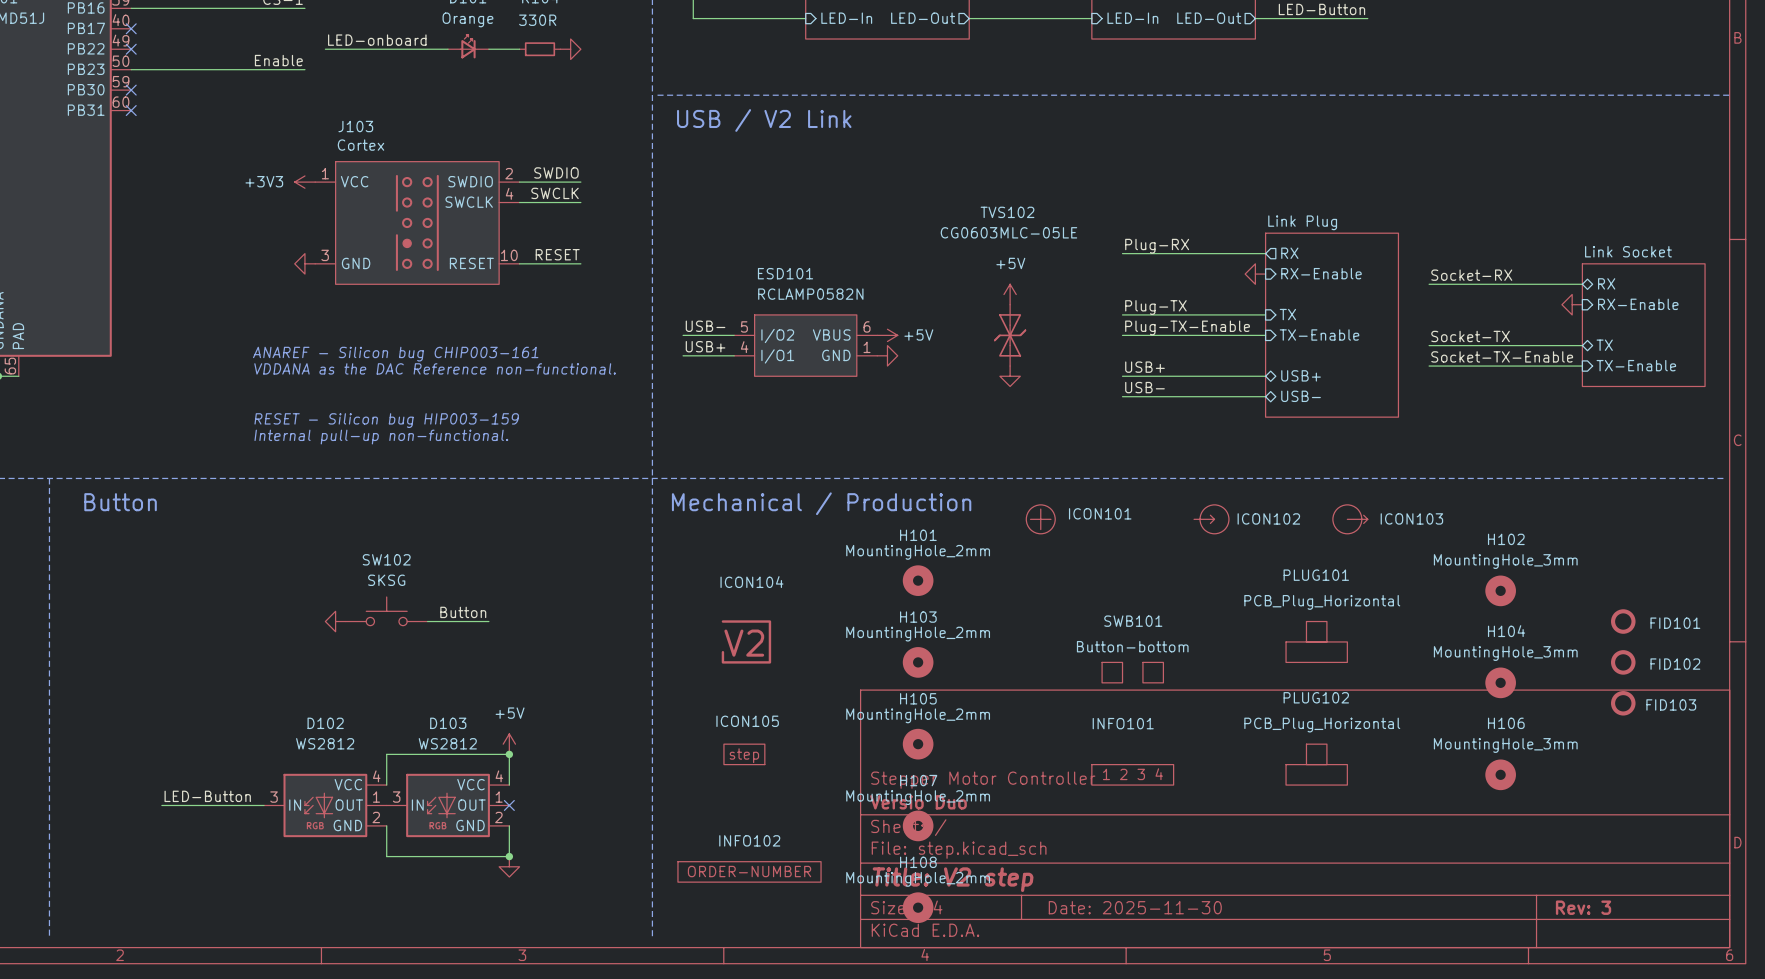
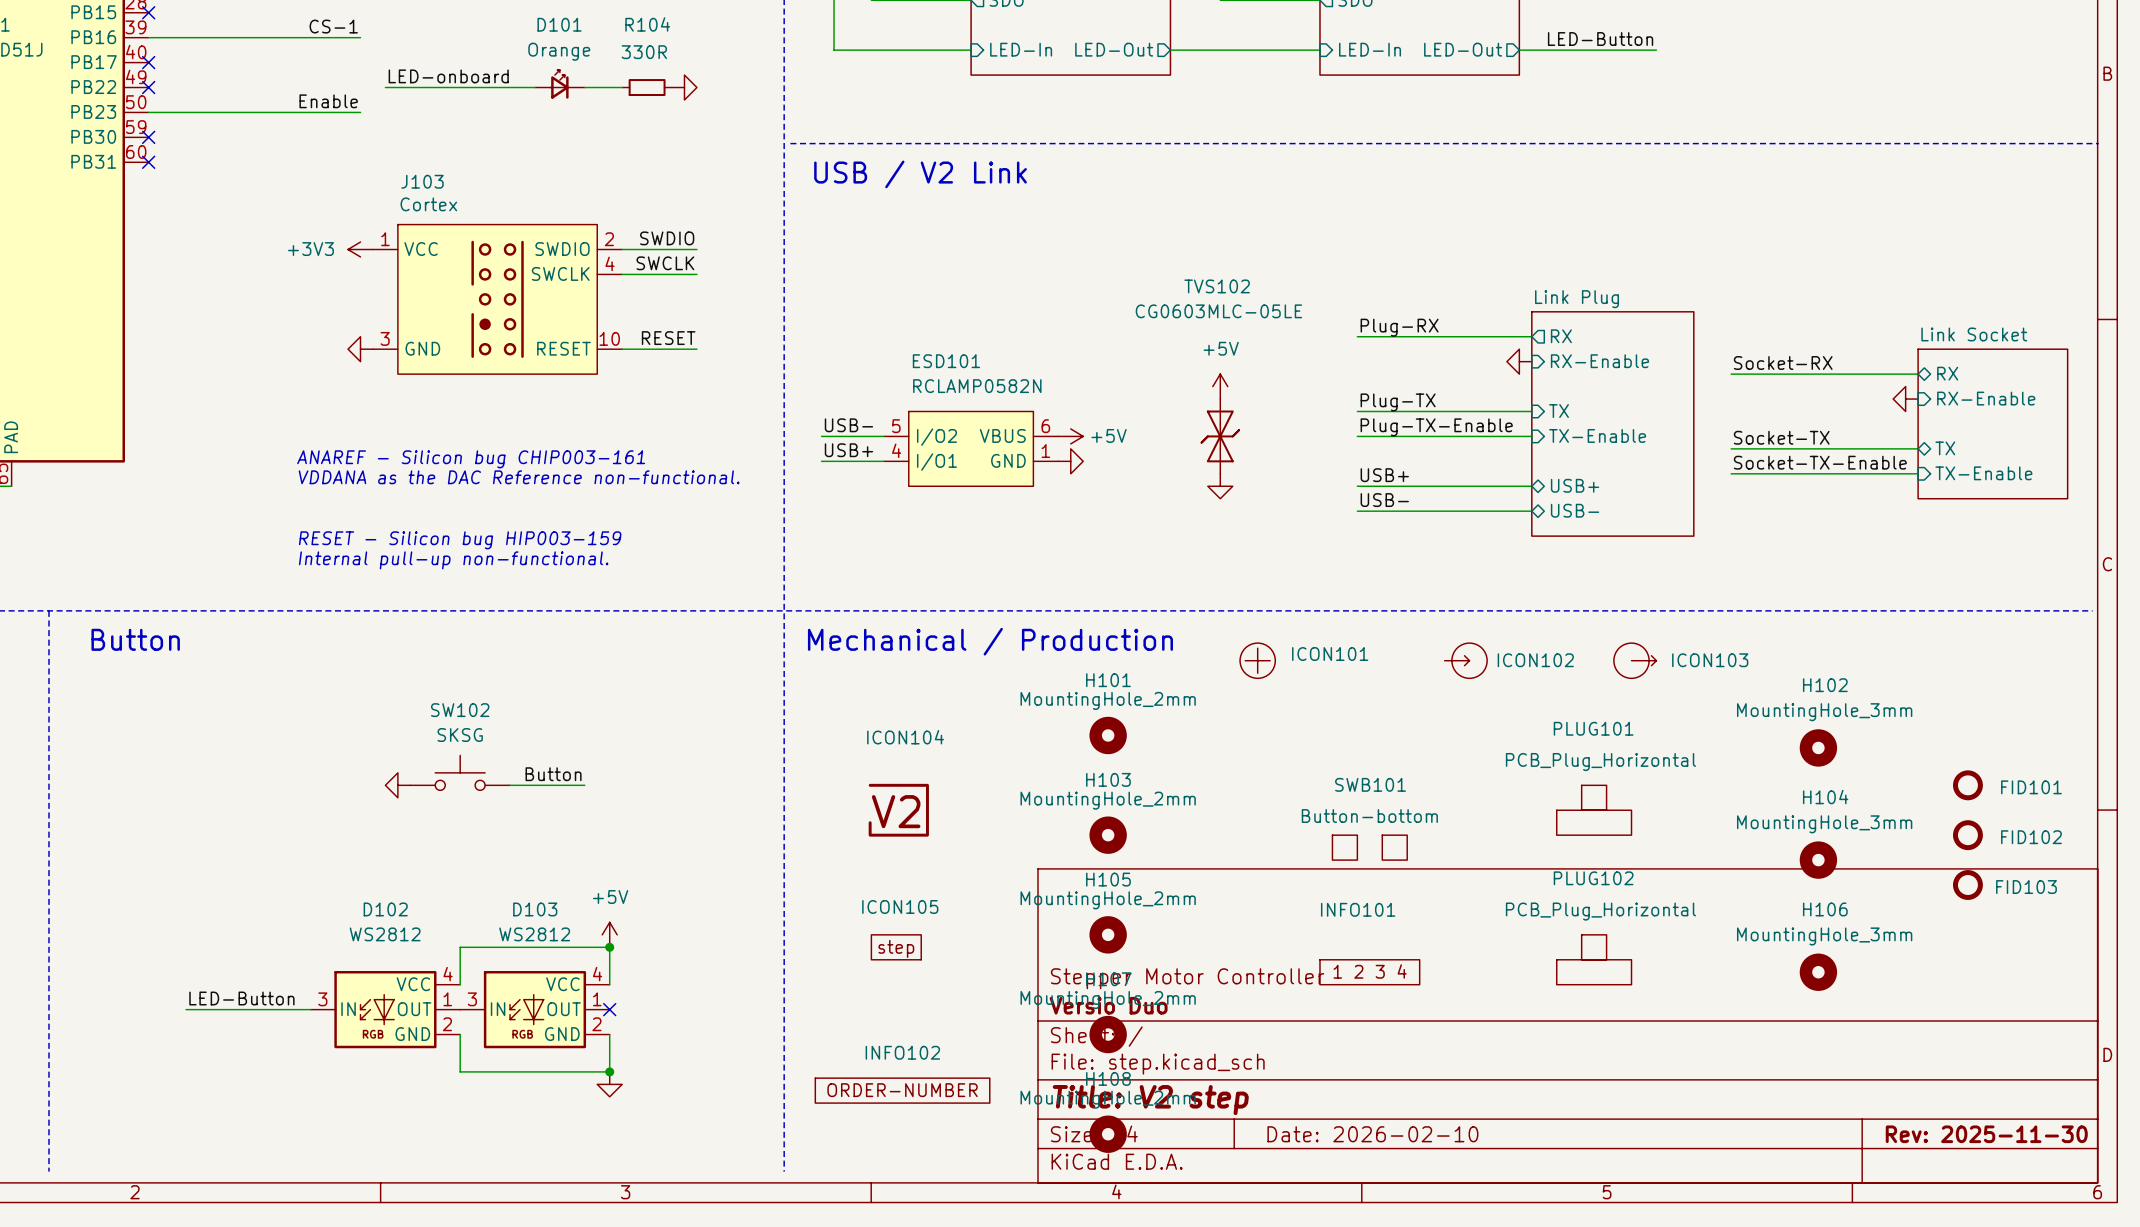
title block: Date: 2025-11-30 (1135, 907) -> Date: 2026-02-10 (1372, 1134)
title block: Rev: 3 (1583, 907) -> Rev: 2025-11-30 (1986, 1134)

